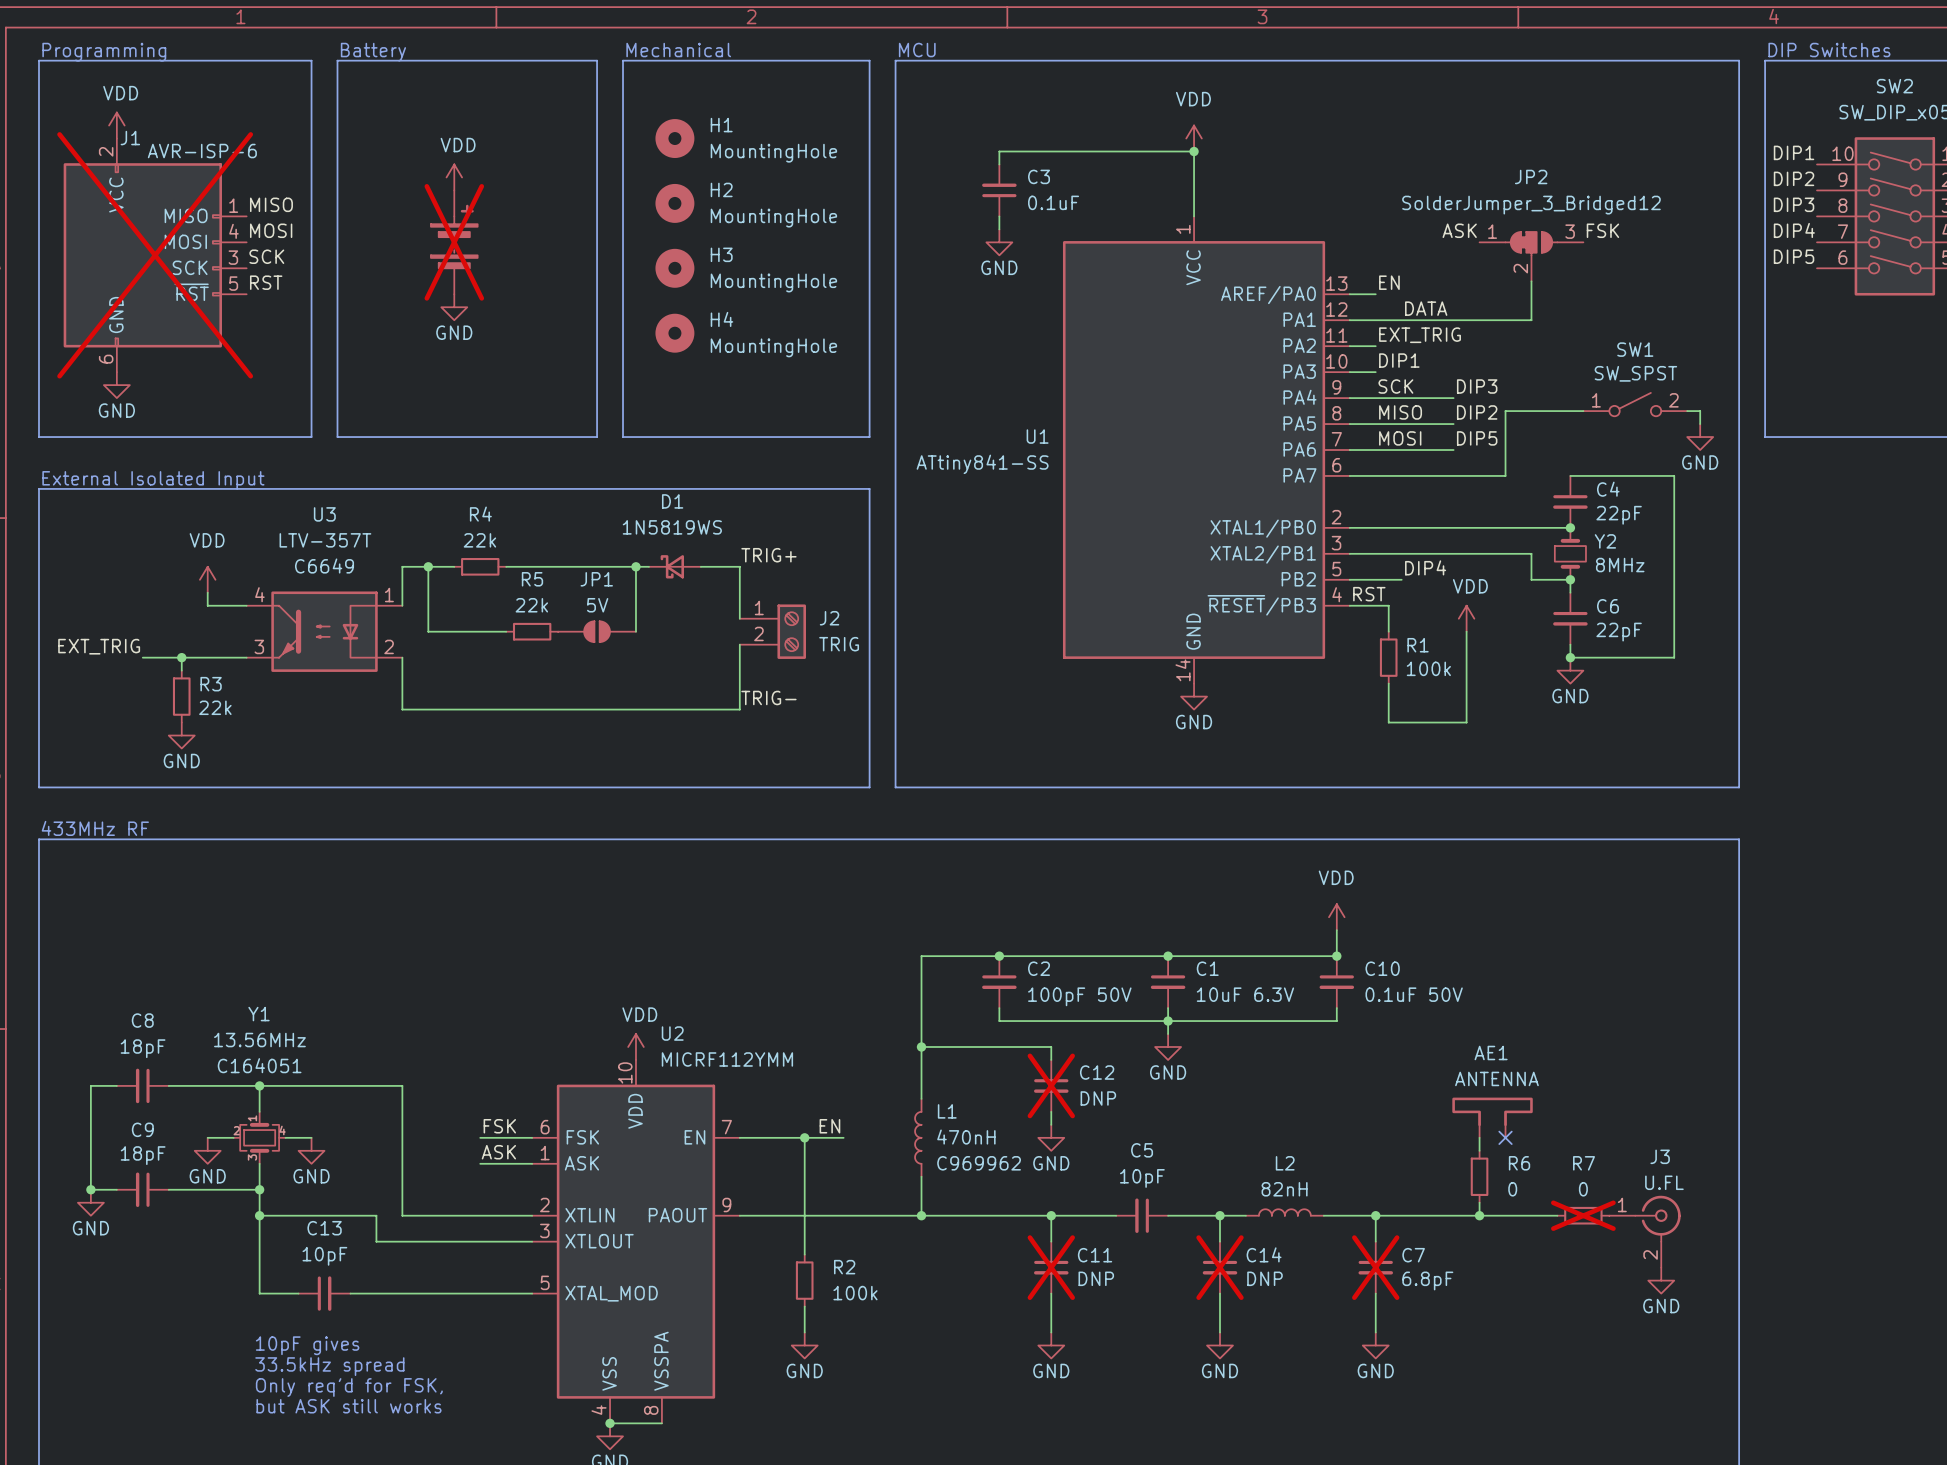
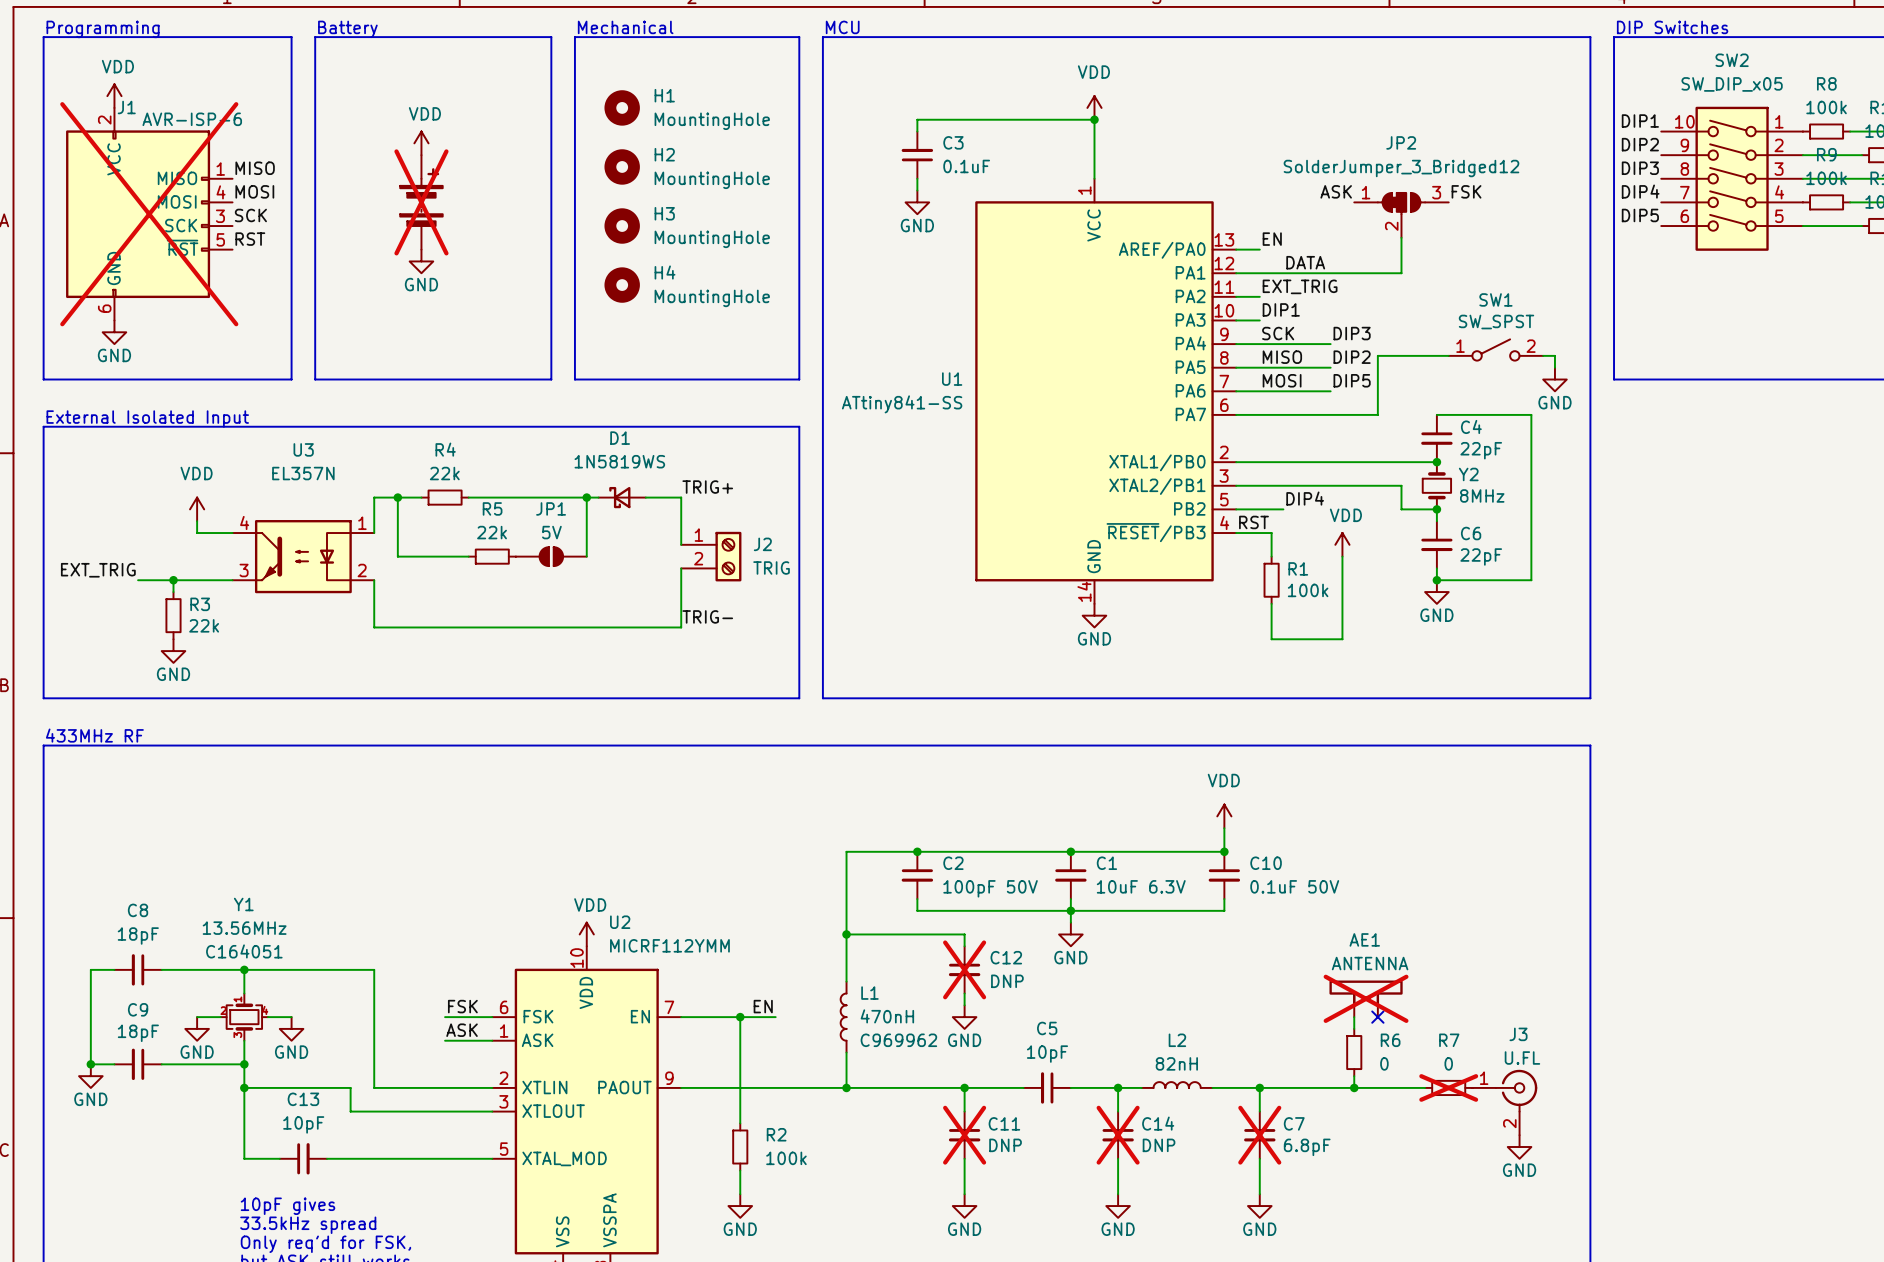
U3 value: LTV-357T (325, 540) -> EL357N (303, 473)
U3 text: C6649 (324, 566) -> none
AE1 do-not-place cross: none -> (1366, 998)

